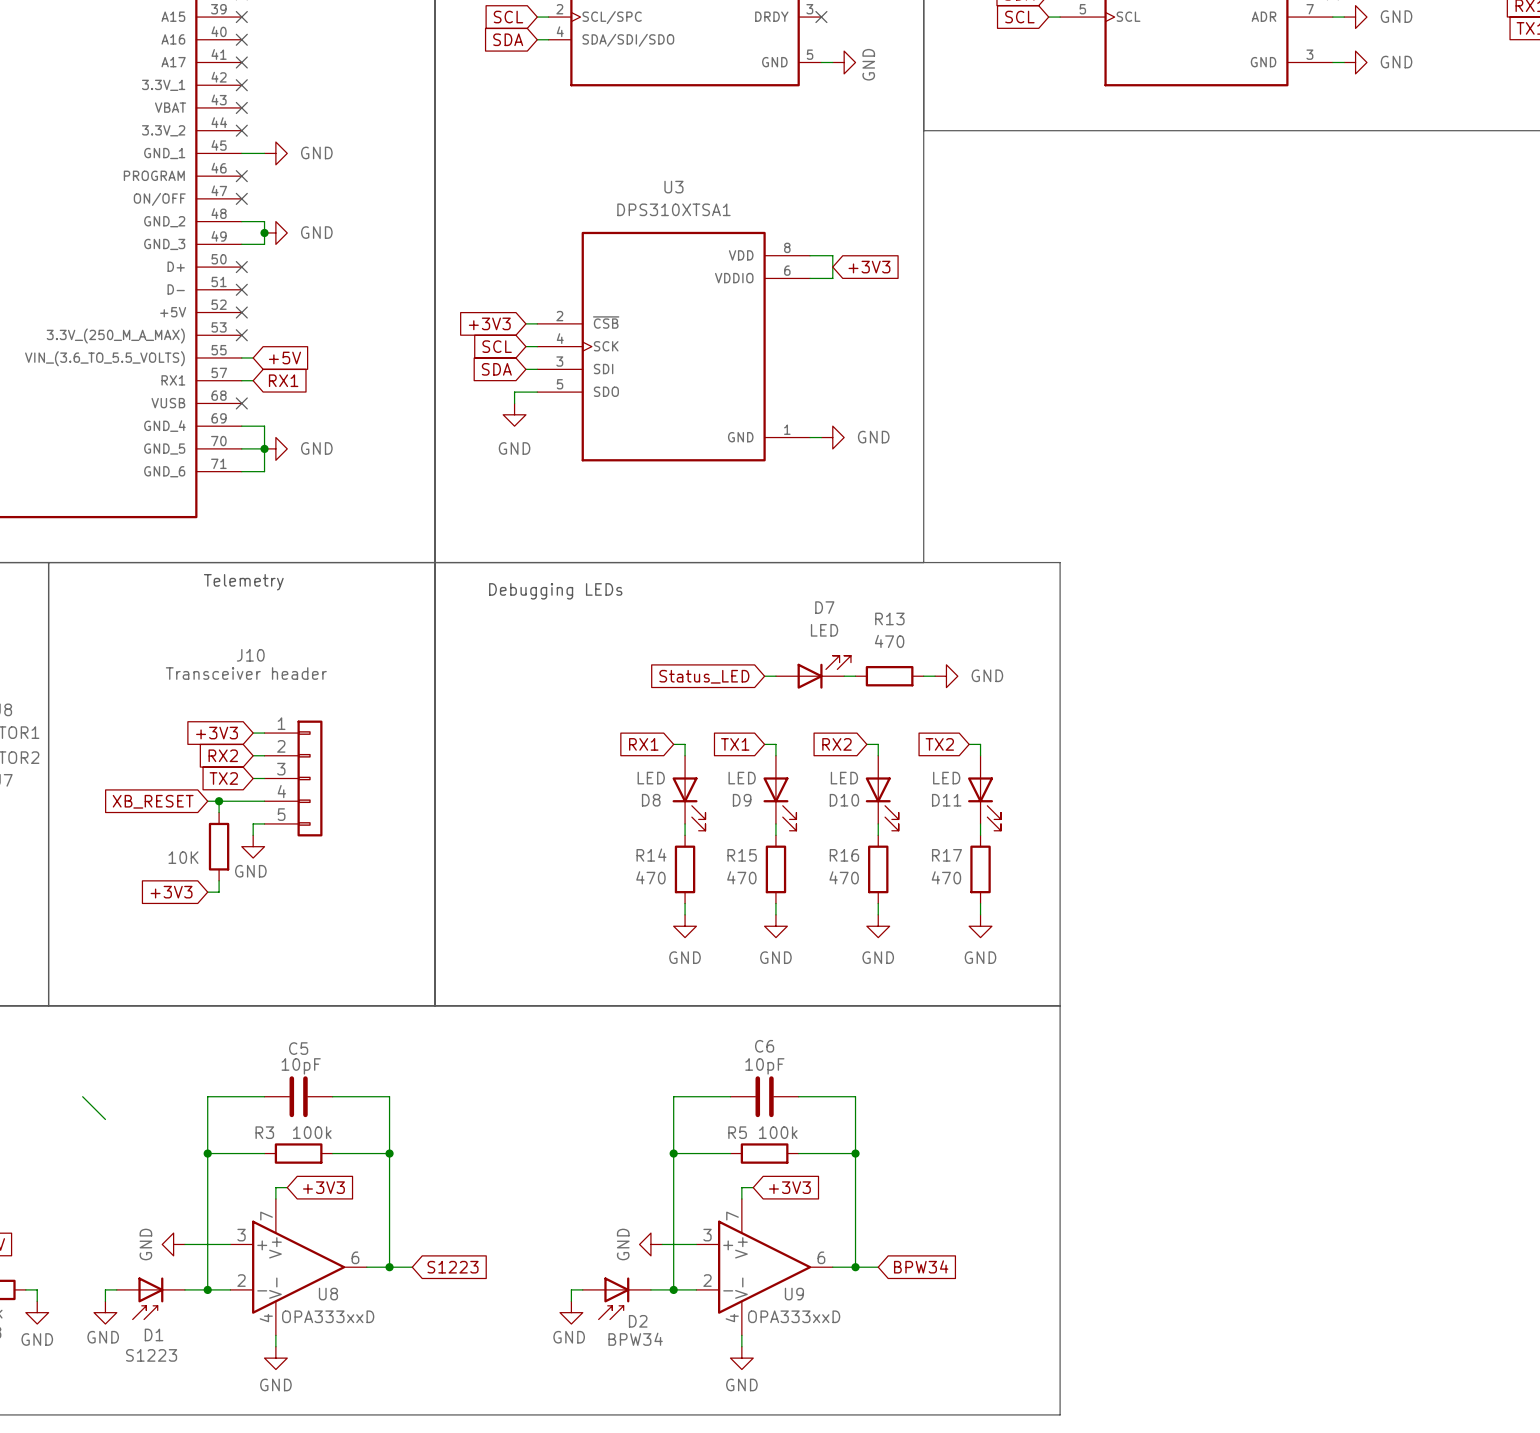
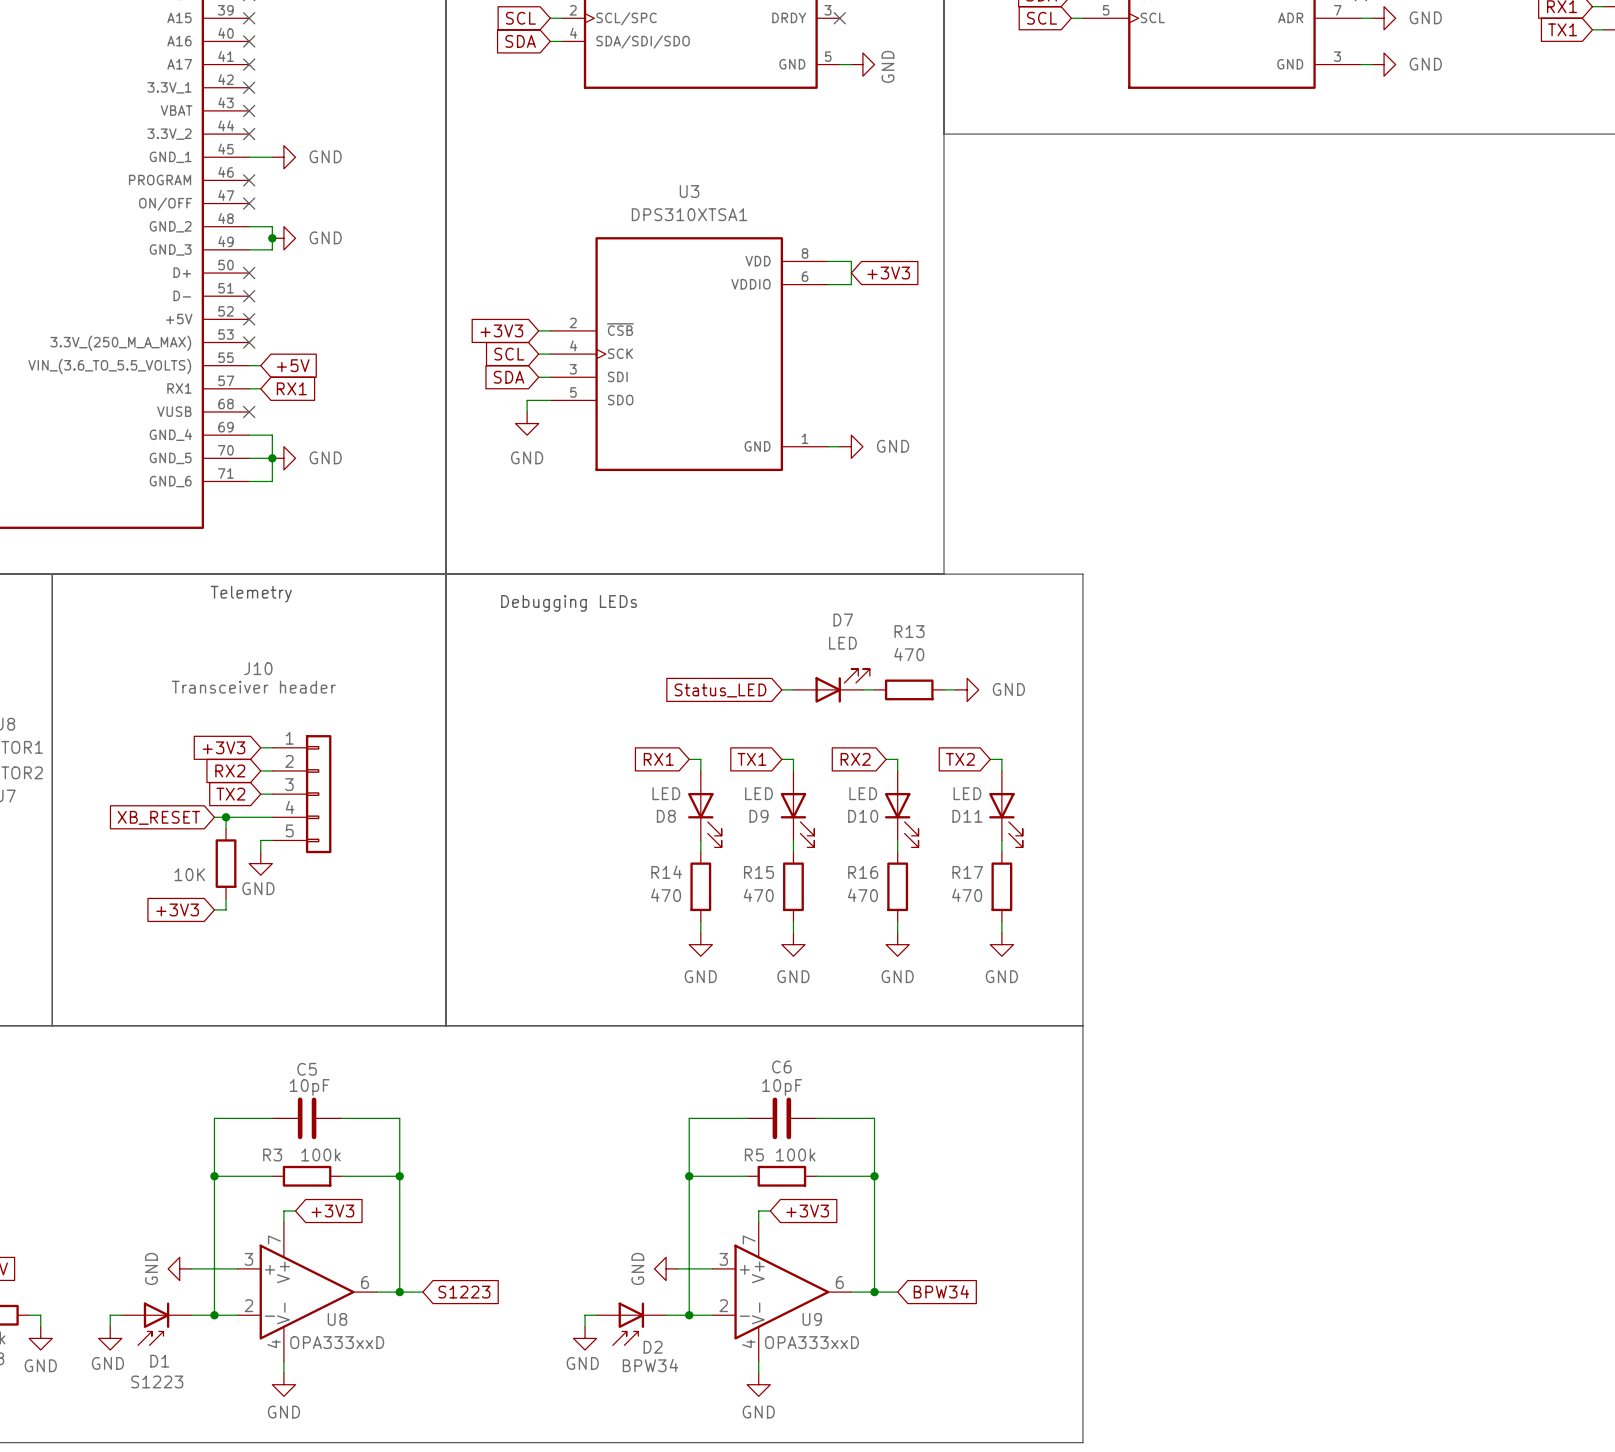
wire: (82, 1096) (105, 1119) -> none

